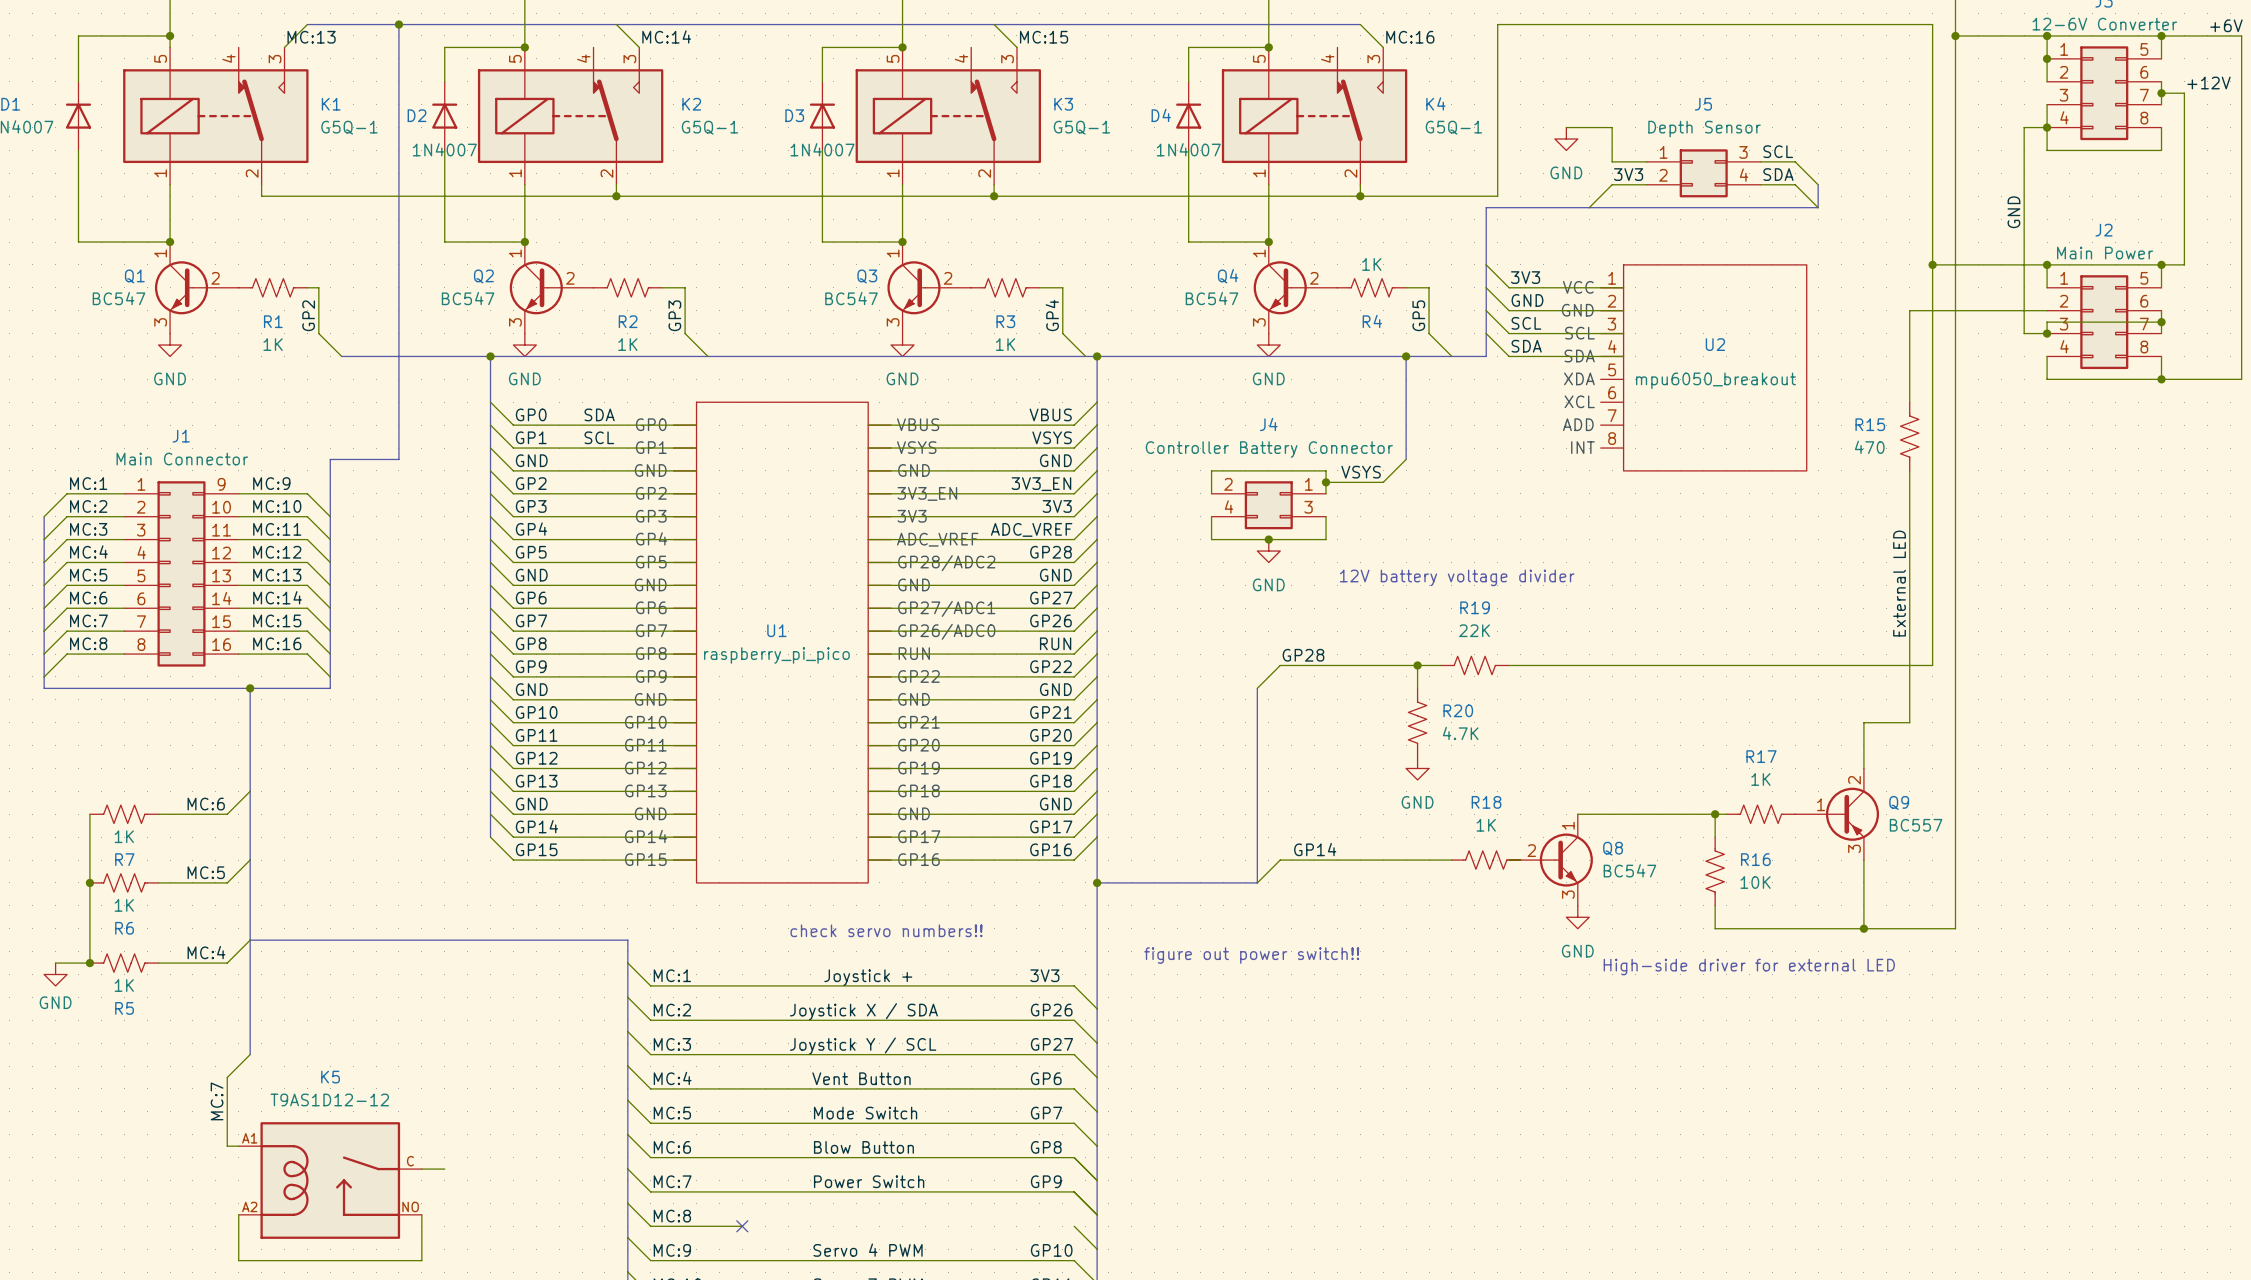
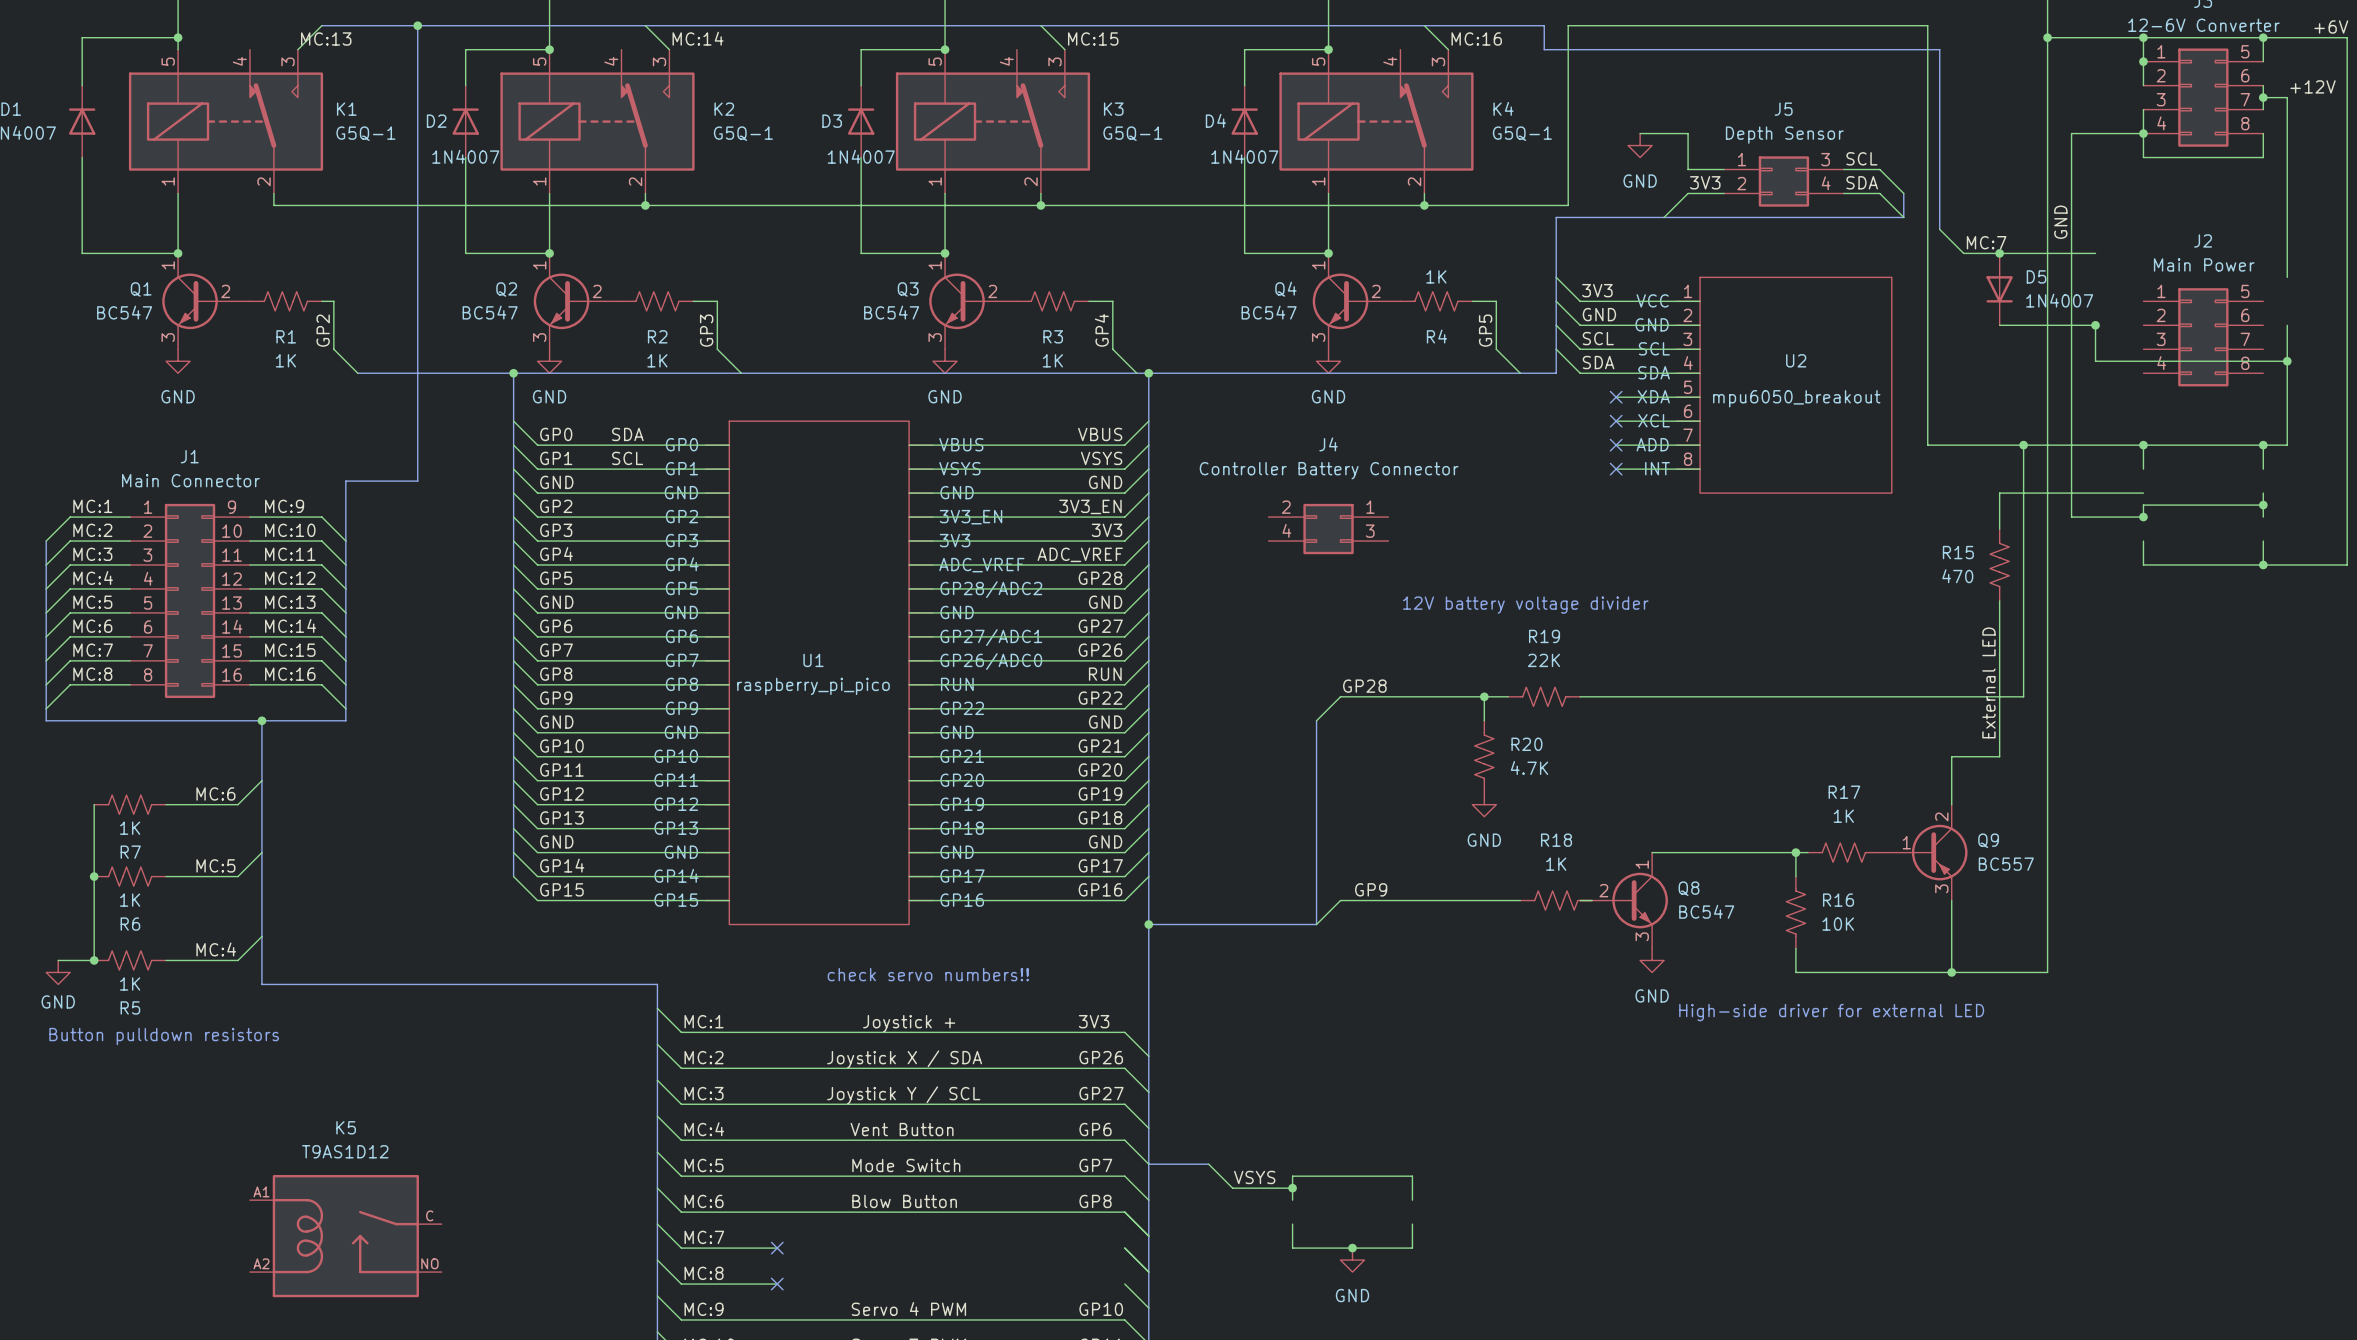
bus: none -> (1424, 25) (1544, 25) (1544, 49) (1939, 49) (1939, 229)
wire: (1841, 24) (1932, 24) (1932, 425) -> (1927, 25) (1927, 445) (2287, 445) (2287, 325)
wire: (2024, 127) (2024, 333) (2047, 333) (2047, 322) (2161, 322) -> (2119, 133) (2071, 133) (2071, 517) (2143, 517) (2143, 505) (2263, 505)
label position: GND (2013, 212) -> GND (2060, 222)
wire: none -> (1939, 229) (1963, 253) (2095, 253)
label: none -> MC:7 (1986, 242)
wire: (1932, 264) (2184, 264) -> none
junction position: (1932, 264) -> (1999, 253)
wire: (2047, 264) (2047, 287) -> (2143, 445) (2143, 469)
junction: (2047, 264) -> none
wire: (2161, 264) (2161, 287) -> (2263, 445) (2263, 469)
junction: (2161, 264) -> none
D5: none -> 1N4007 (1999, 289)
wire: (1909, 310) (1909, 402) -> none
wire: (2001, 310) (2047, 310) -> (2095, 325) (2095, 361) (2287, 361)
junction: none -> (2095, 325)
wire: (2161, 310) (2161, 333) -> (2263, 493) (2263, 517)
junction: (2161, 322) -> none
junction: (2047, 333) -> none
junction: none -> (2287, 361)
bus: (1406, 356) (1406, 459) -> none
junction: (1406, 356) -> none
wire: (2047, 356) (2047, 379) (2241, 379) -> (2143, 541) (2143, 564) (2347, 564) (2347, 397)
wire: (2161, 356) (2161, 379) -> (2263, 541) (2263, 564)
wire: none -> (1616, 397) (1700, 397)
no-connect mark: none -> (1616, 397)
junction: (2161, 379) -> none
wire: none -> (1616, 421) (1700, 421)
no-connect mark: none -> (1616, 421)
wire: none -> (1616, 445) (1700, 445)
no-connect mark: none -> (1616, 445)
junction: none -> (2023, 445)
junction: none -> (2143, 445)
junction: none -> (2263, 445)
R15 position: (1909, 436) -> (1999, 564)
wire: none -> (1616, 469) (1700, 469)
no-connect mark: none -> (1616, 469)
wire: (1406, 459) (1383, 482) (1326, 482) -> none
wire: none -> (1999, 493) (2143, 493)
label: VSYS (1361, 472) -> none
junction: (1326, 482) -> none
junction: none -> (2263, 505)
wire: (1211, 493) (1211, 470) (1326, 470) (1326, 493) -> none
junction: none -> (2143, 517)
wire: (1211, 516) (1211, 539) (1326, 539) (1326, 516) -> none
junction: (1268, 539) -> none
junction: none -> (2263, 564)
power symbol: GND (1268, 551) -> none
label position: External LED (1899, 583) -> External LED (1988, 682)
wire: none -> (94, 804) (94, 852)
wire: (250, 791) (227, 814) (158, 814) -> (261, 780) (237, 804) (166, 804)
label position: MC:6 (206, 804) -> MC:6 (215, 793)
R7 position: (124, 814) -> (130, 804)
junction: none -> (94, 876)
label: GP14 (1315, 849) -> GP9 (1371, 889)
wire: (250, 860) (227, 882) (158, 882) -> (261, 852) (237, 876) (166, 876)
label position: MC:5 (206, 872) -> MC:5 (215, 865)
junction: (89, 882) -> none
R6 position: (124, 882) -> (130, 876)
wire: (89, 917) (89, 963) (55, 963) -> (94, 960) (58, 960)
junction: none -> (94, 960)
wire: (250, 940) (227, 963) (158, 963) -> (261, 936) (237, 960) (166, 960)
bus: (250, 940) (250, 1054) -> none
label position: MC:4 (206, 952) -> MC:4 (216, 949)
text: figure out power switch!! (1251, 955) -> none
junction: (89, 963) -> none
R5 position: (124, 963) -> (130, 960)
power symbol position: GND (55, 974) -> GND (58, 972)
text: none -> Button pulldown resistors (164, 1036)
wire: (250, 1054) (227, 1077) (227, 1146) (238, 1146) -> none
K5 value: T9AS1D12-12 (329, 1099) -> T9AS1D12 (345, 1151)
label: MC:7 (217, 1101) -> none
bus: none -> (1148, 1164) (1208, 1164)
wire: none -> (1208, 1164) (1232, 1188) (1292, 1188)
label: none -> VSYS (1254, 1177)
junction: none -> (1292, 1188)
wire: none -> (1292, 1200) (1292, 1176) (1412, 1176) (1412, 1200)
wire: (421, 1169) (444, 1169) -> none
wire: none -> (1292, 1224) (1292, 1248) (1412, 1248) (1412, 1224)
label: Power Switch (869, 1181) -> none
label: GP9 (1046, 1181) -> none
wire: (742, 1191) (1074, 1191) -> none
no-connect mark: none -> (777, 1248)
junction: none -> (1352, 1248)
power symbol: none -> GND (1352, 1260)
wire: (238, 1214) (238, 1260) (421, 1260) (421, 1214) -> none

